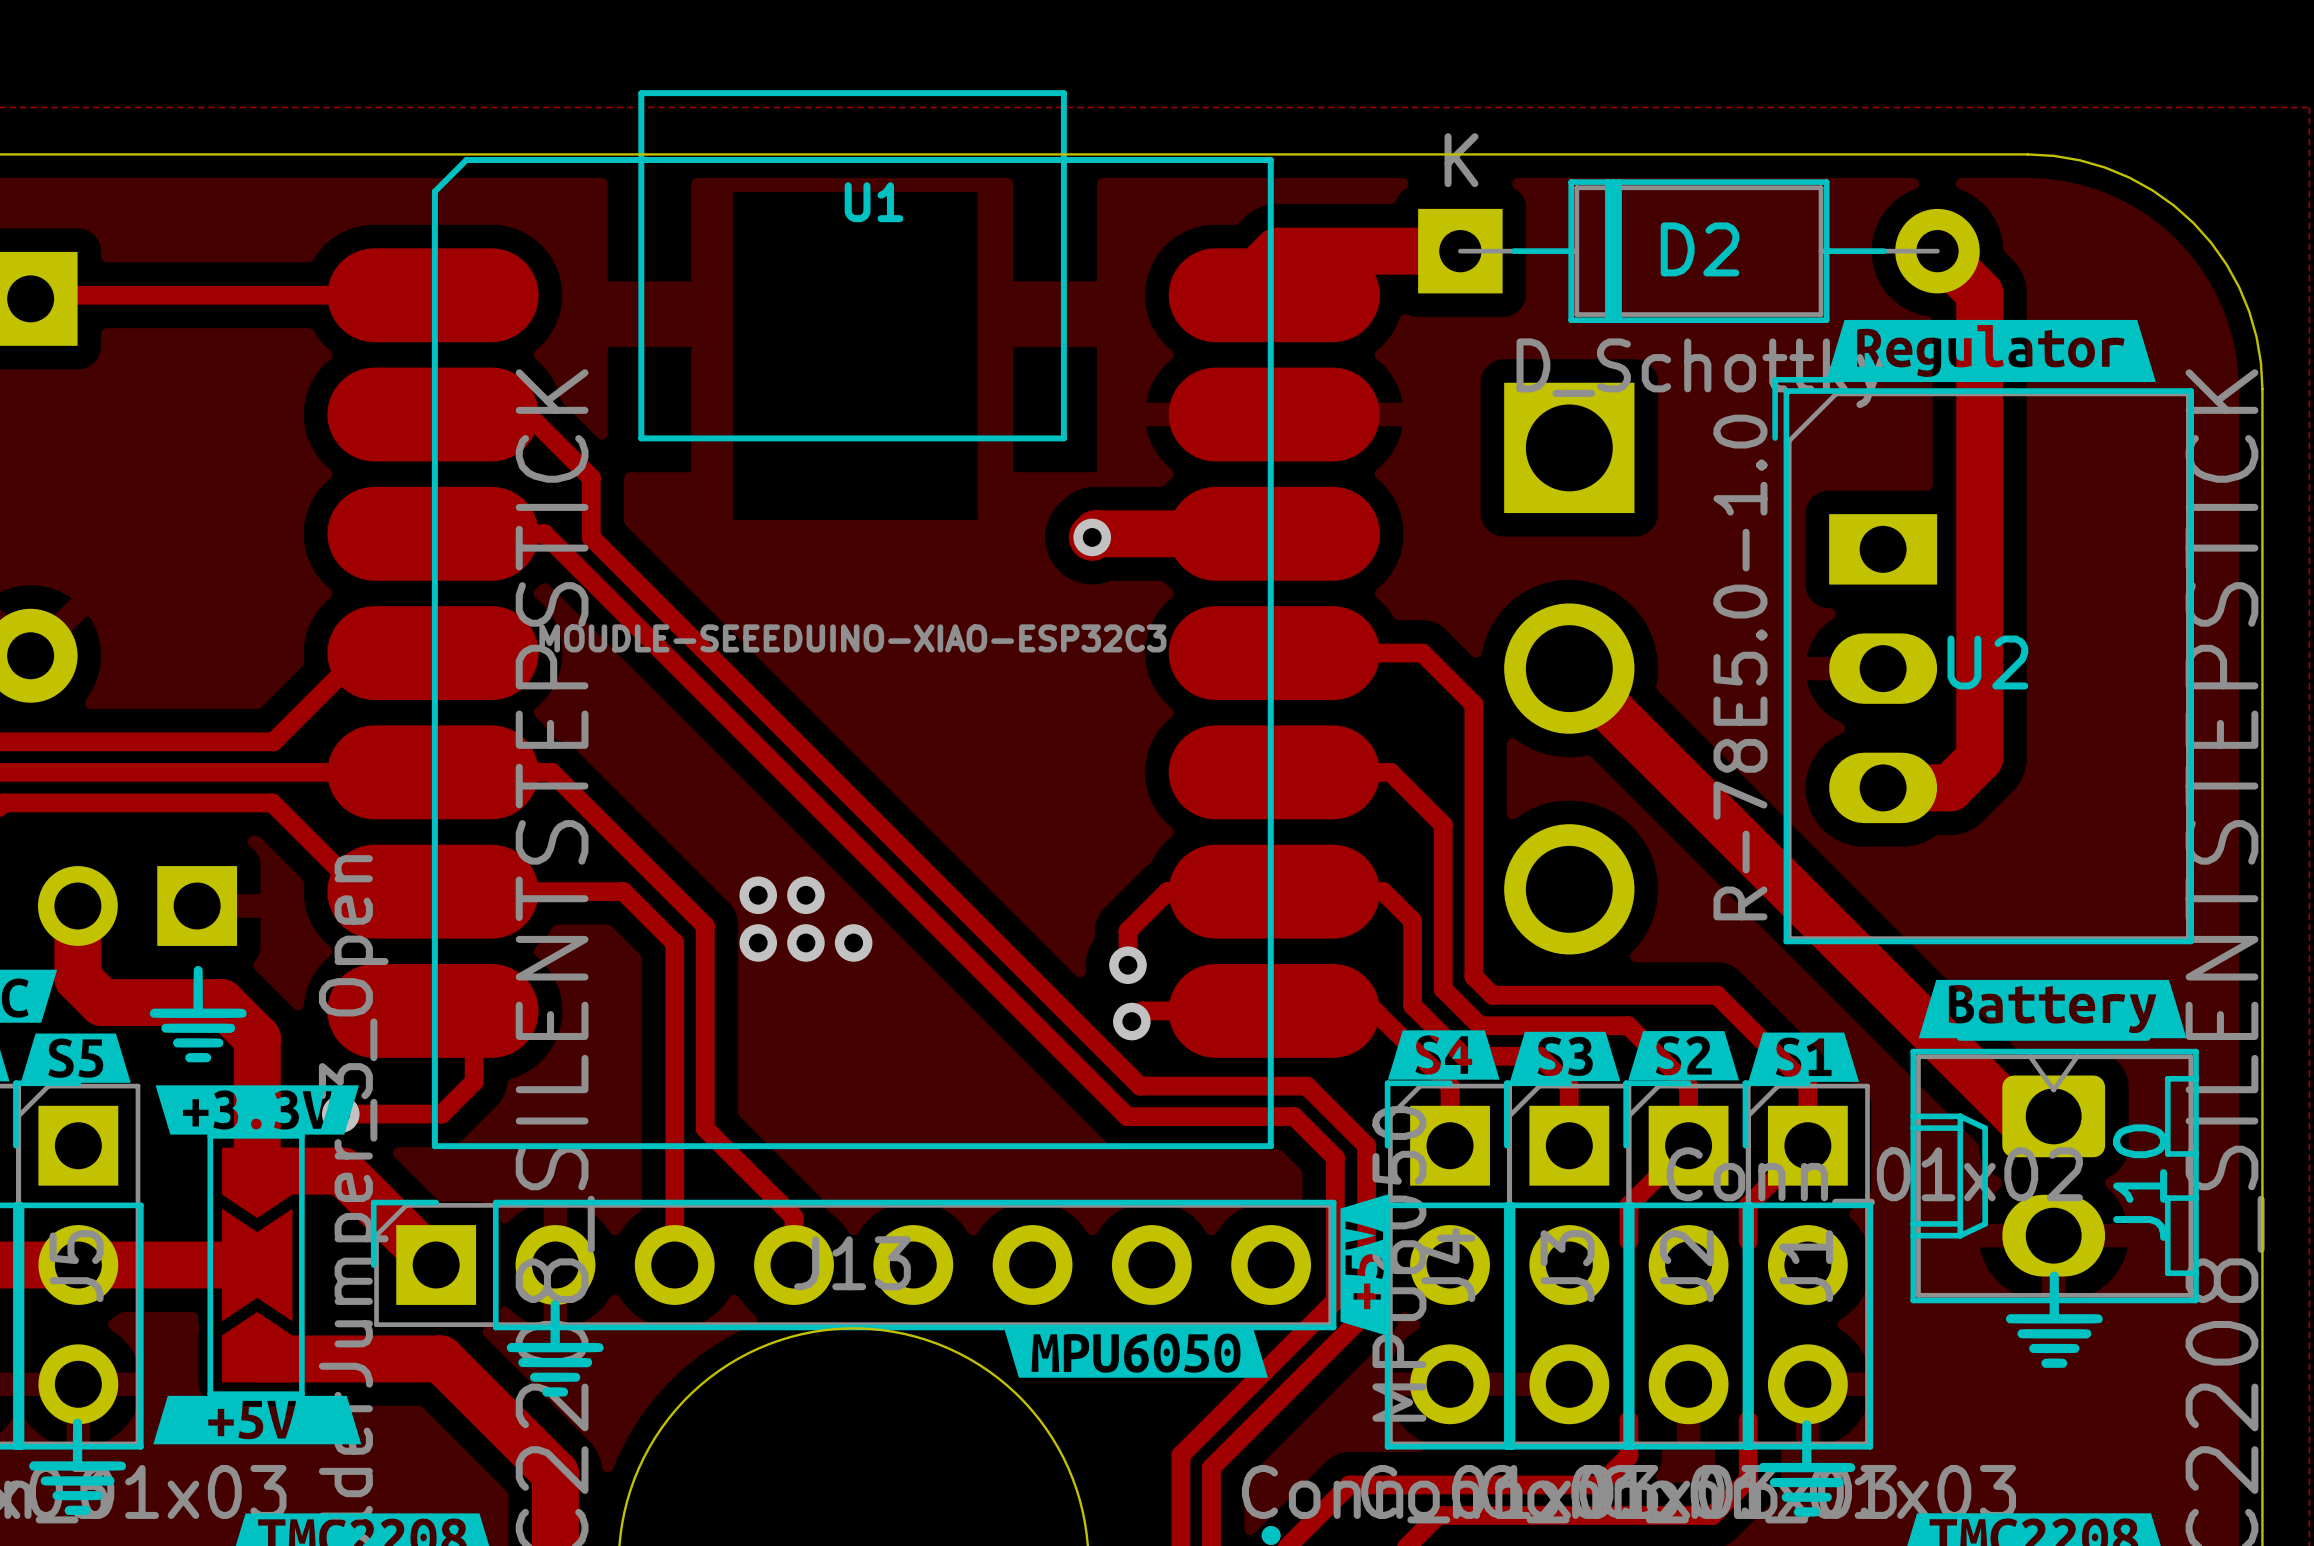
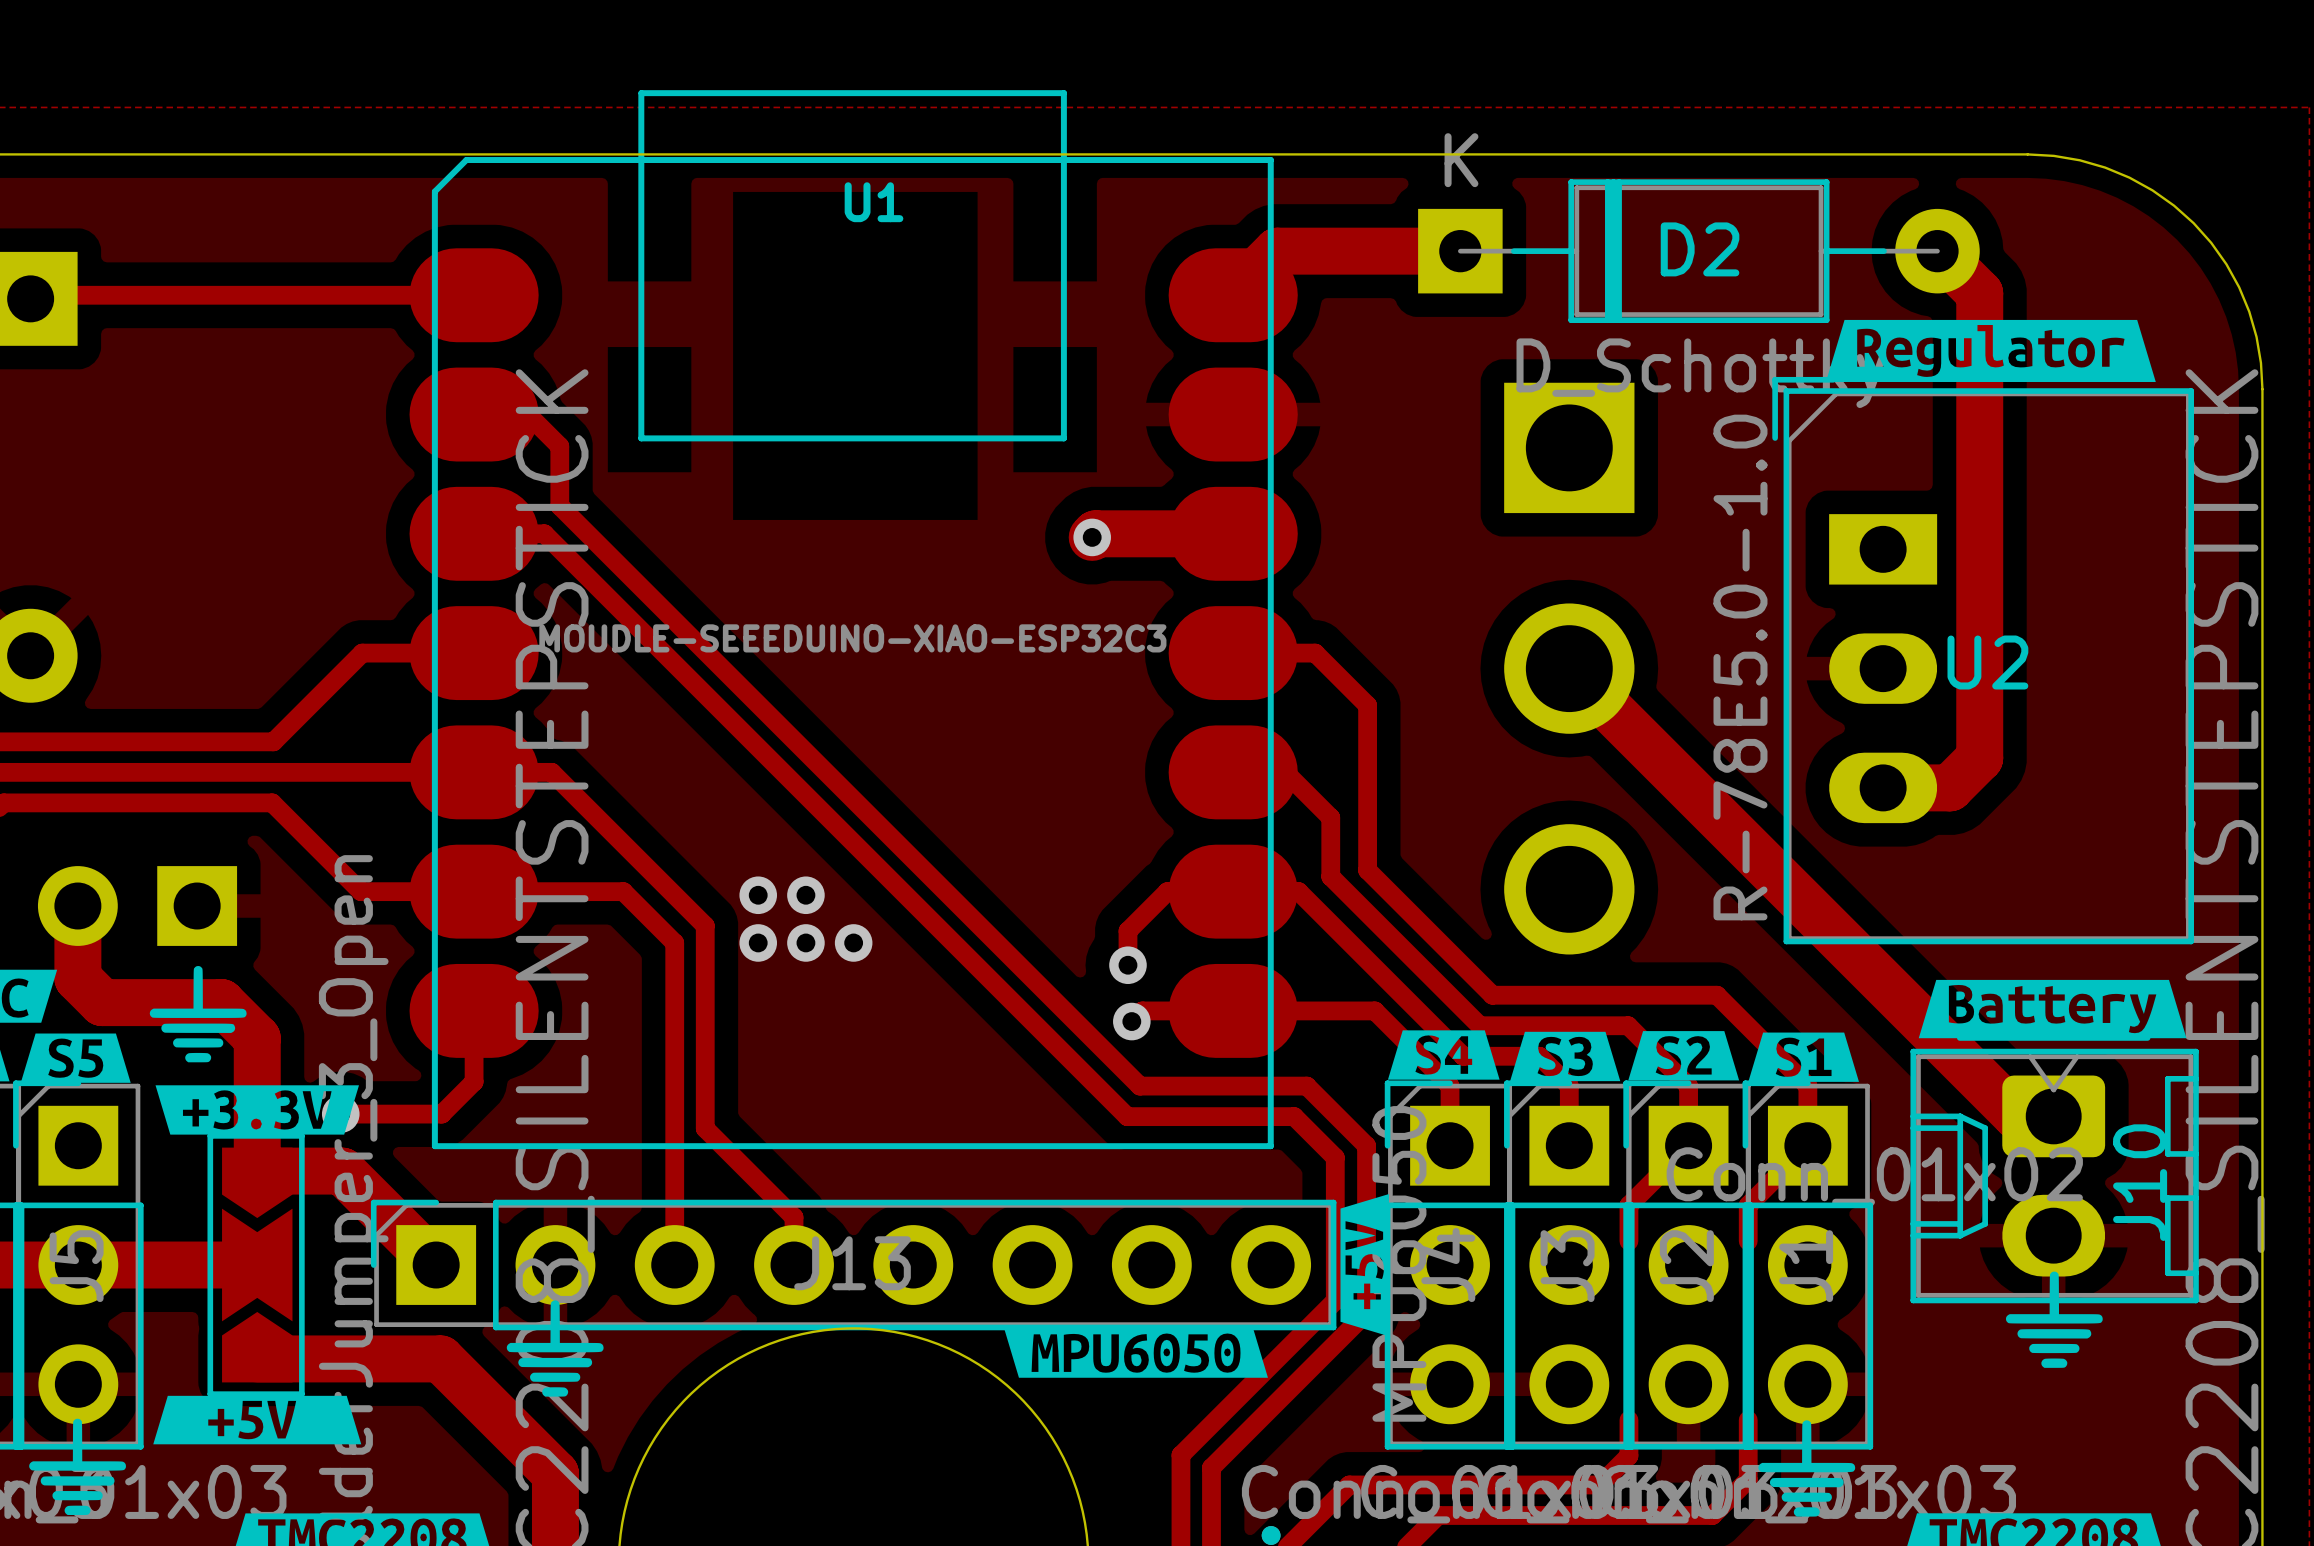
U1 footprint: [327, 90, 1380, 1150] -> [409, 90, 1298, 1150]
track: (559, 446) (591, 477) (591, 537) -> (559, 446) (559, 505) (591, 537)
track: (1315, 653) (1422, 653) (1473, 704) (1473, 976) -> (1315, 653) (1367, 705) (1367, 870) (1473, 976)
track: (1285, 772) (1390, 772) (1443, 824) (1443, 989) -> (1285, 772) (1330, 817) (1330, 876) (1443, 989)
track: (1298, 891) (1383, 891) (1412, 920) (1412, 1005) -> (1298, 891) (1412, 1005)

